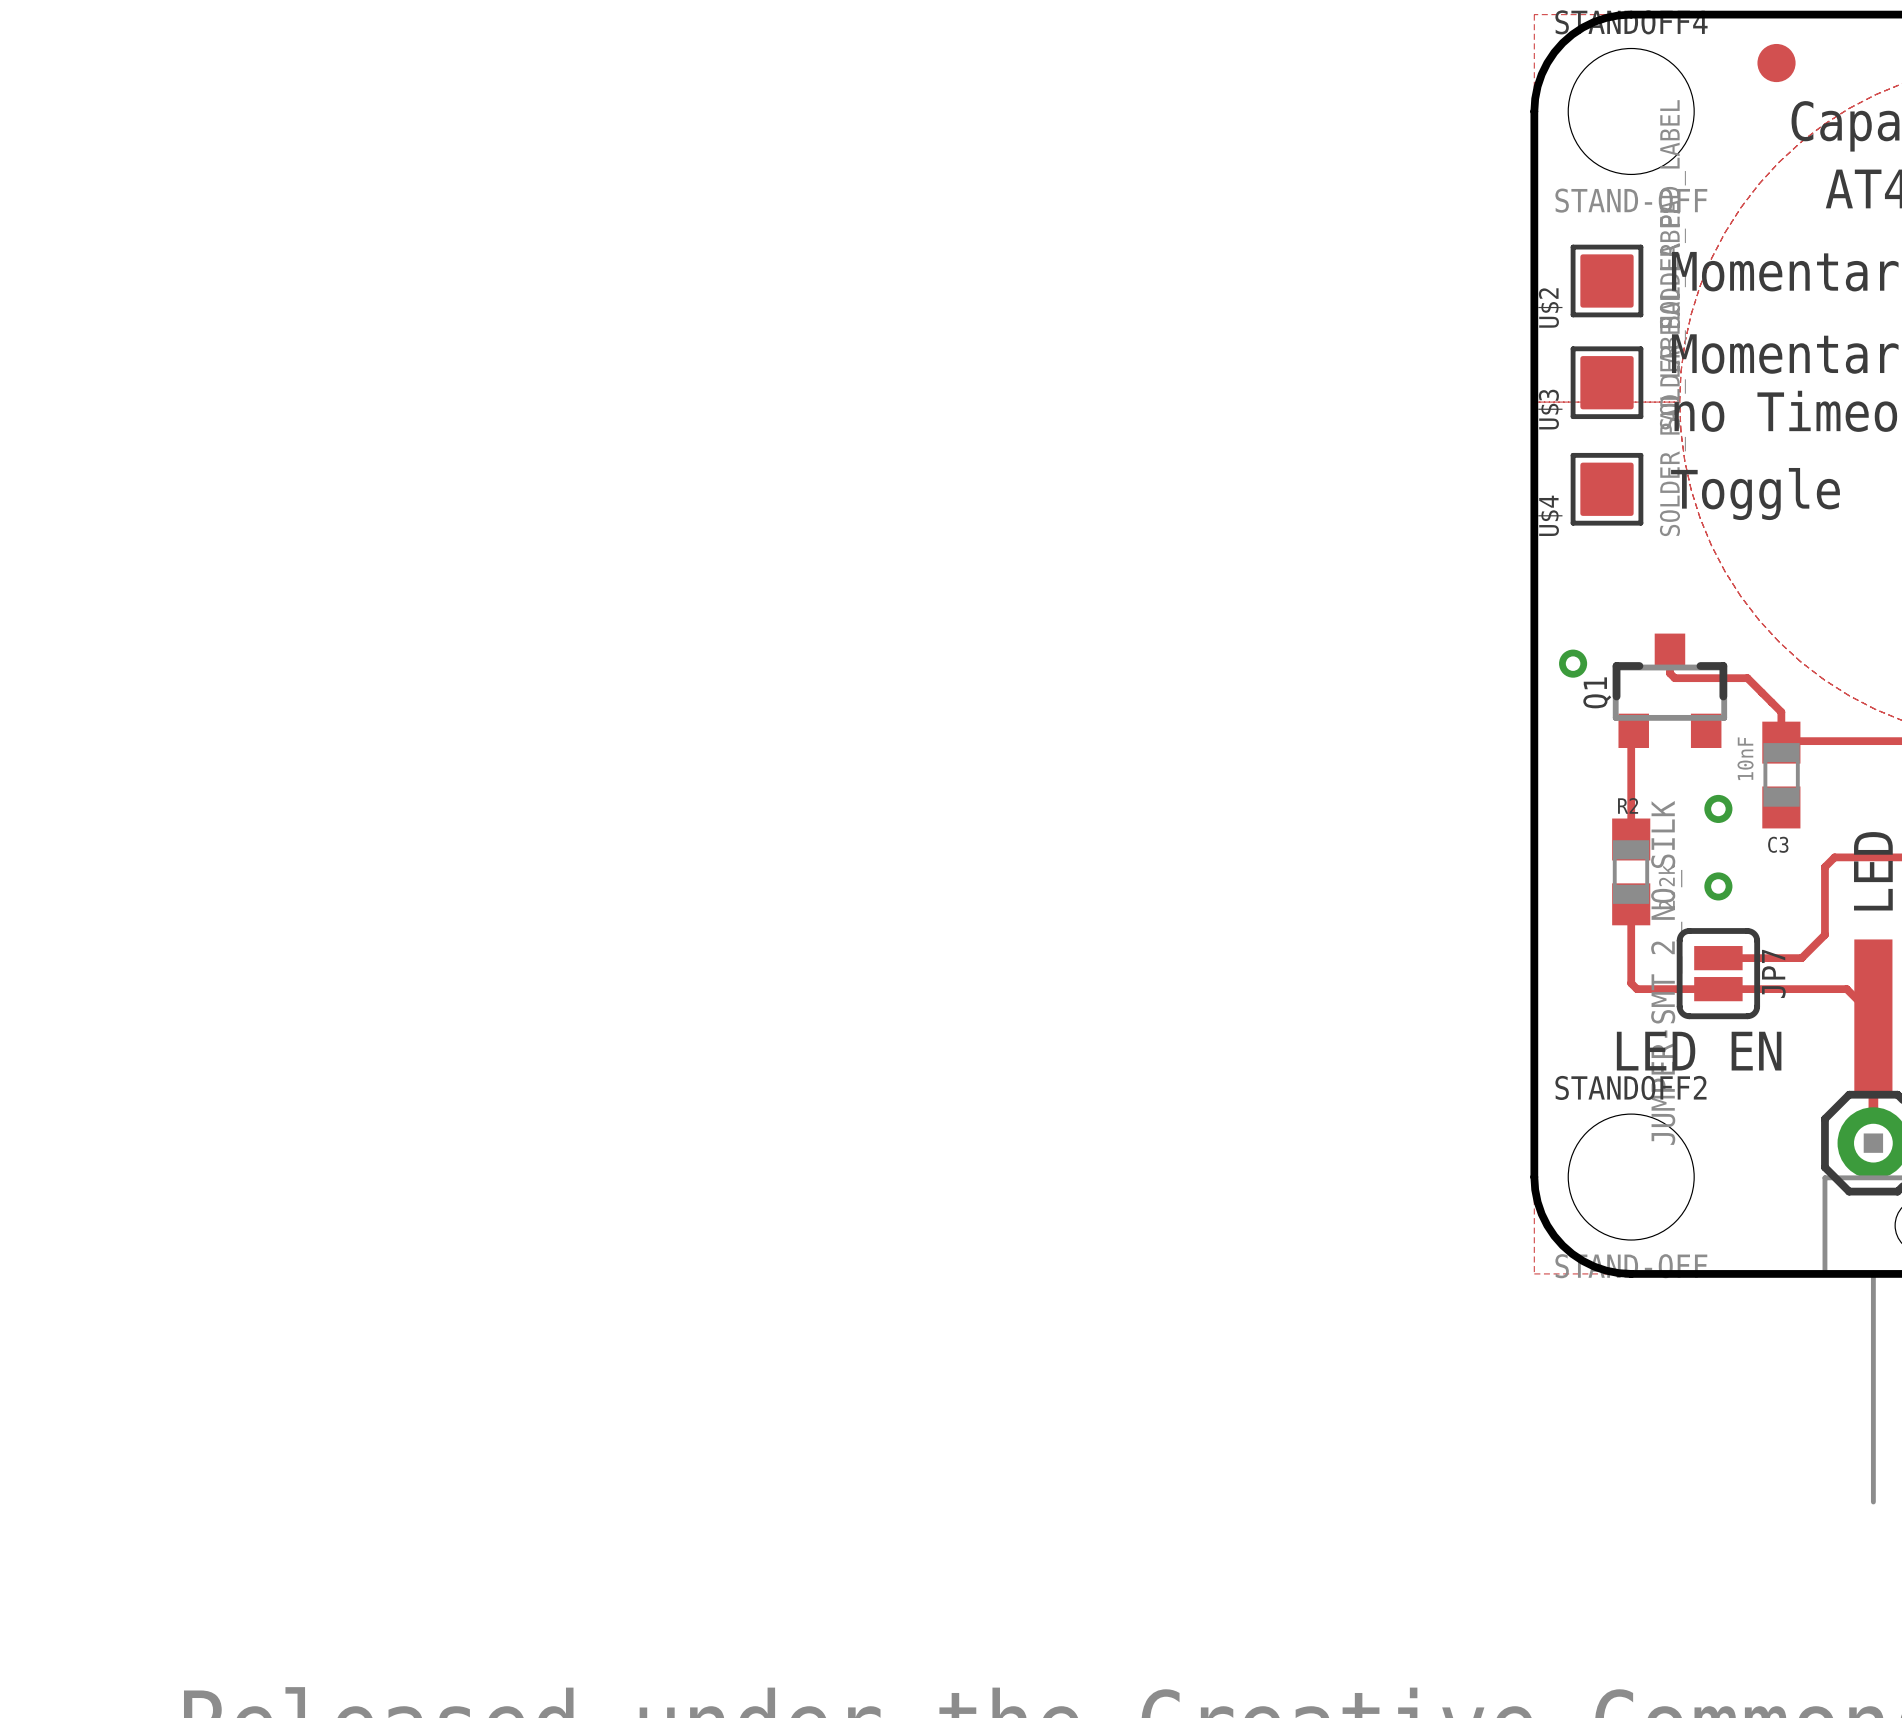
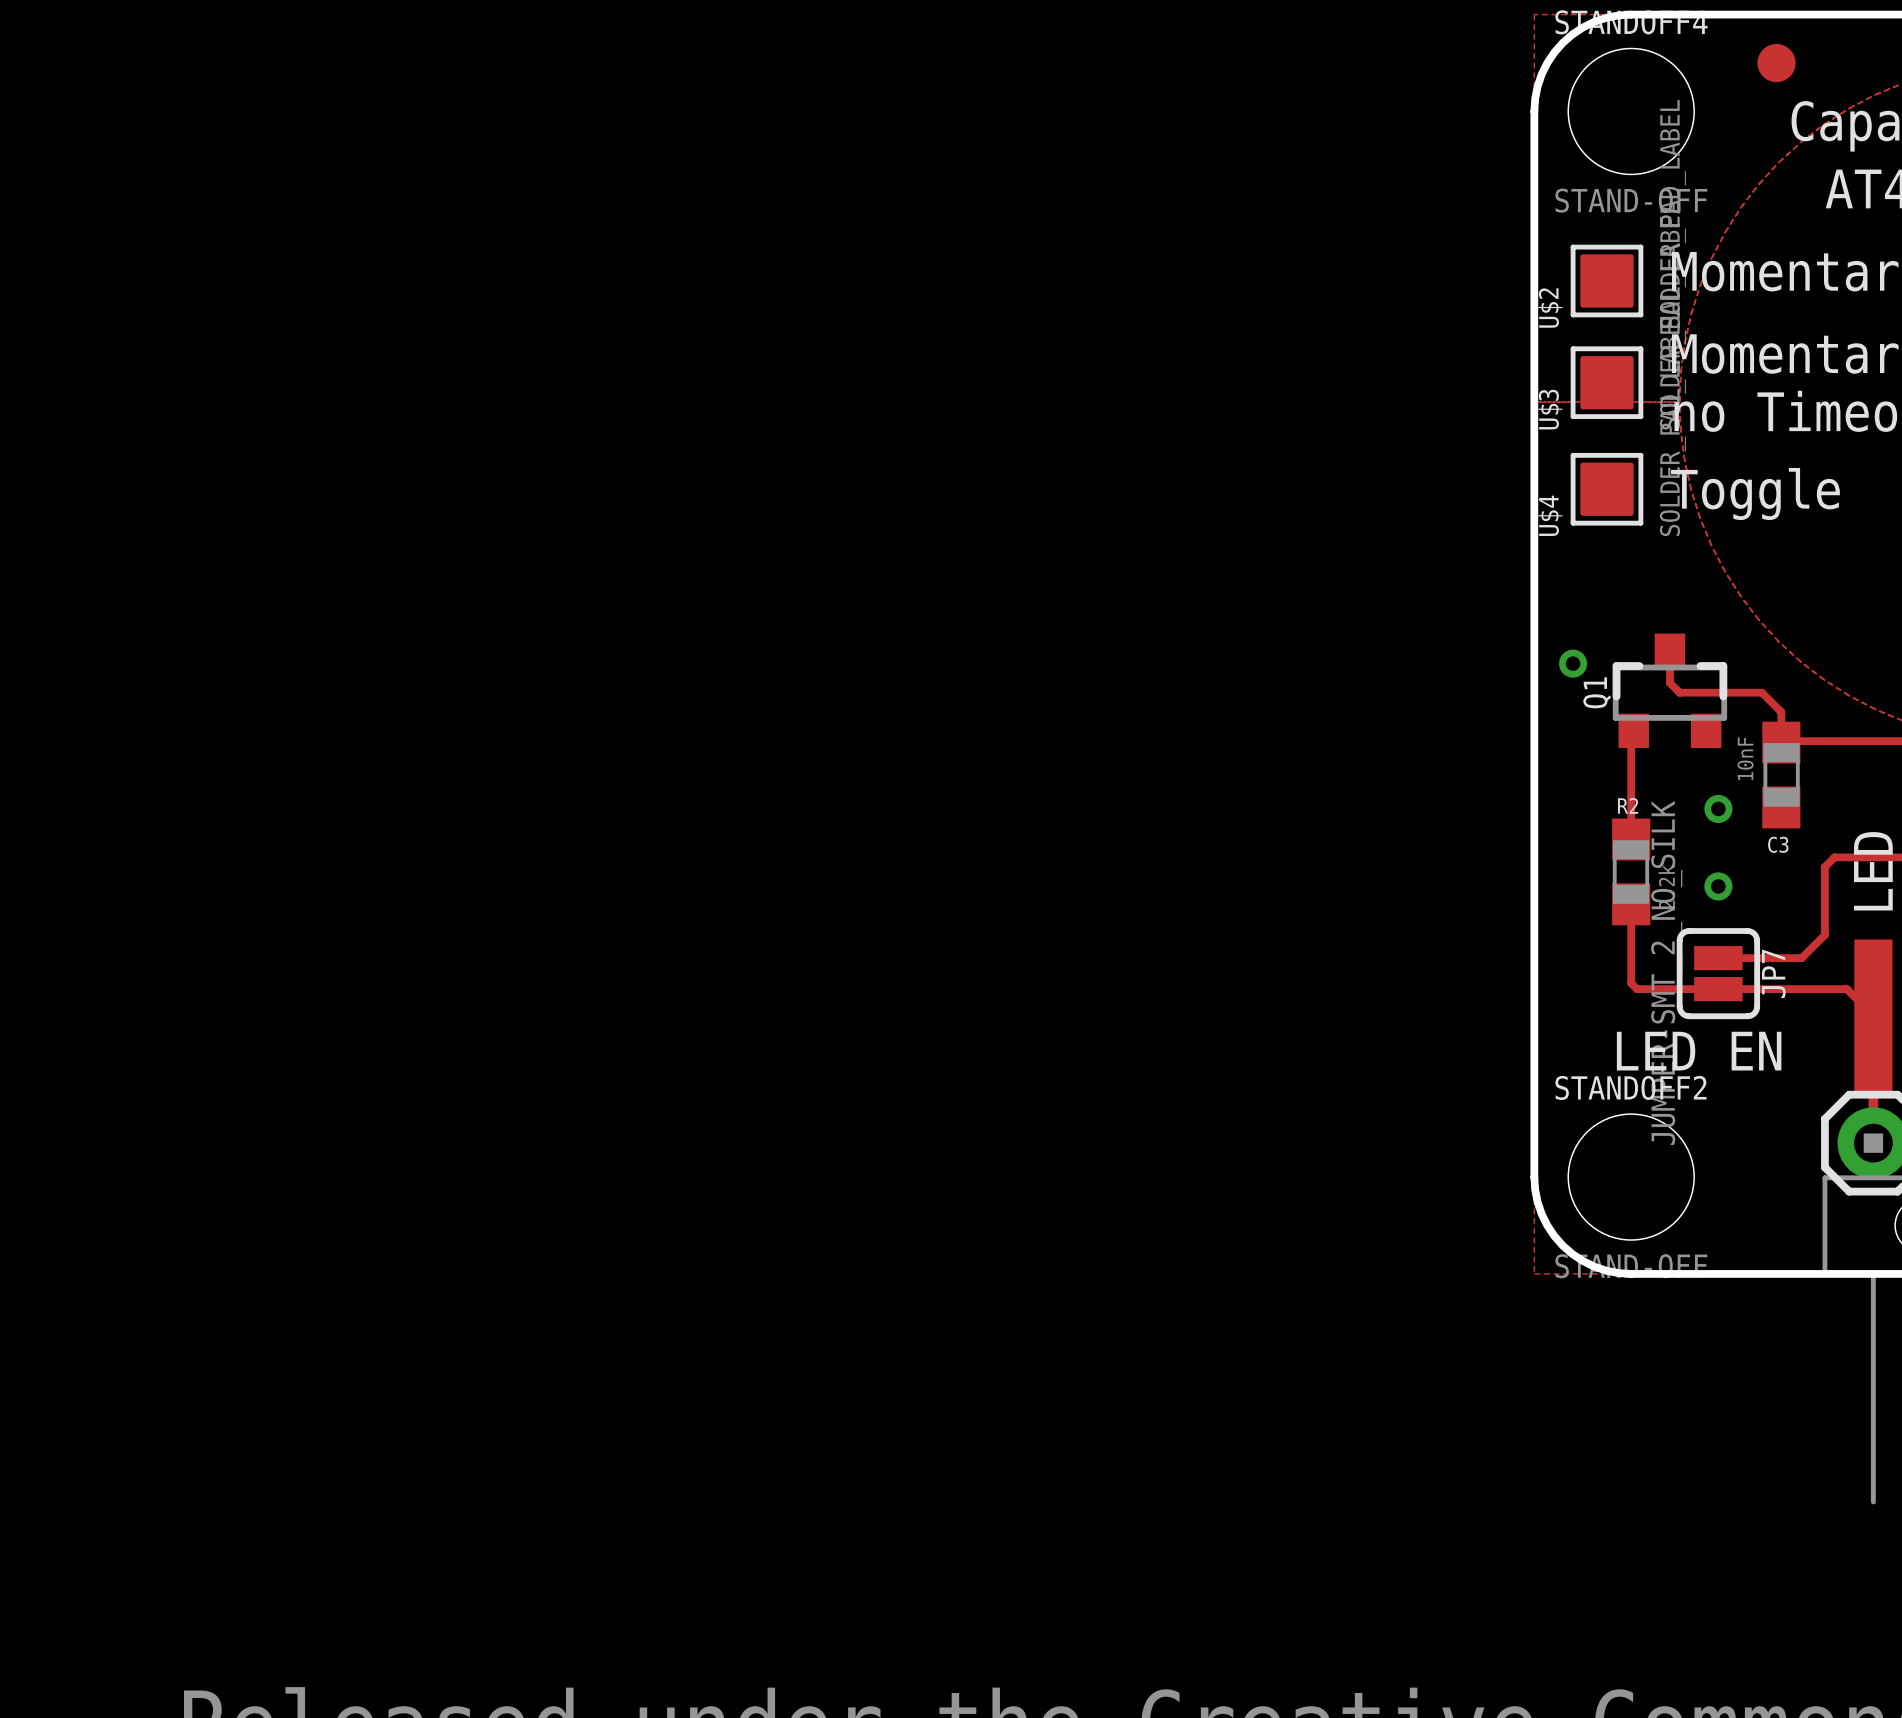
track: (1669, 673) (1674, 678) (1747, 678) (1761, 692) -> (1669, 673) (1669, 683) (1679, 692) (1761, 692)

